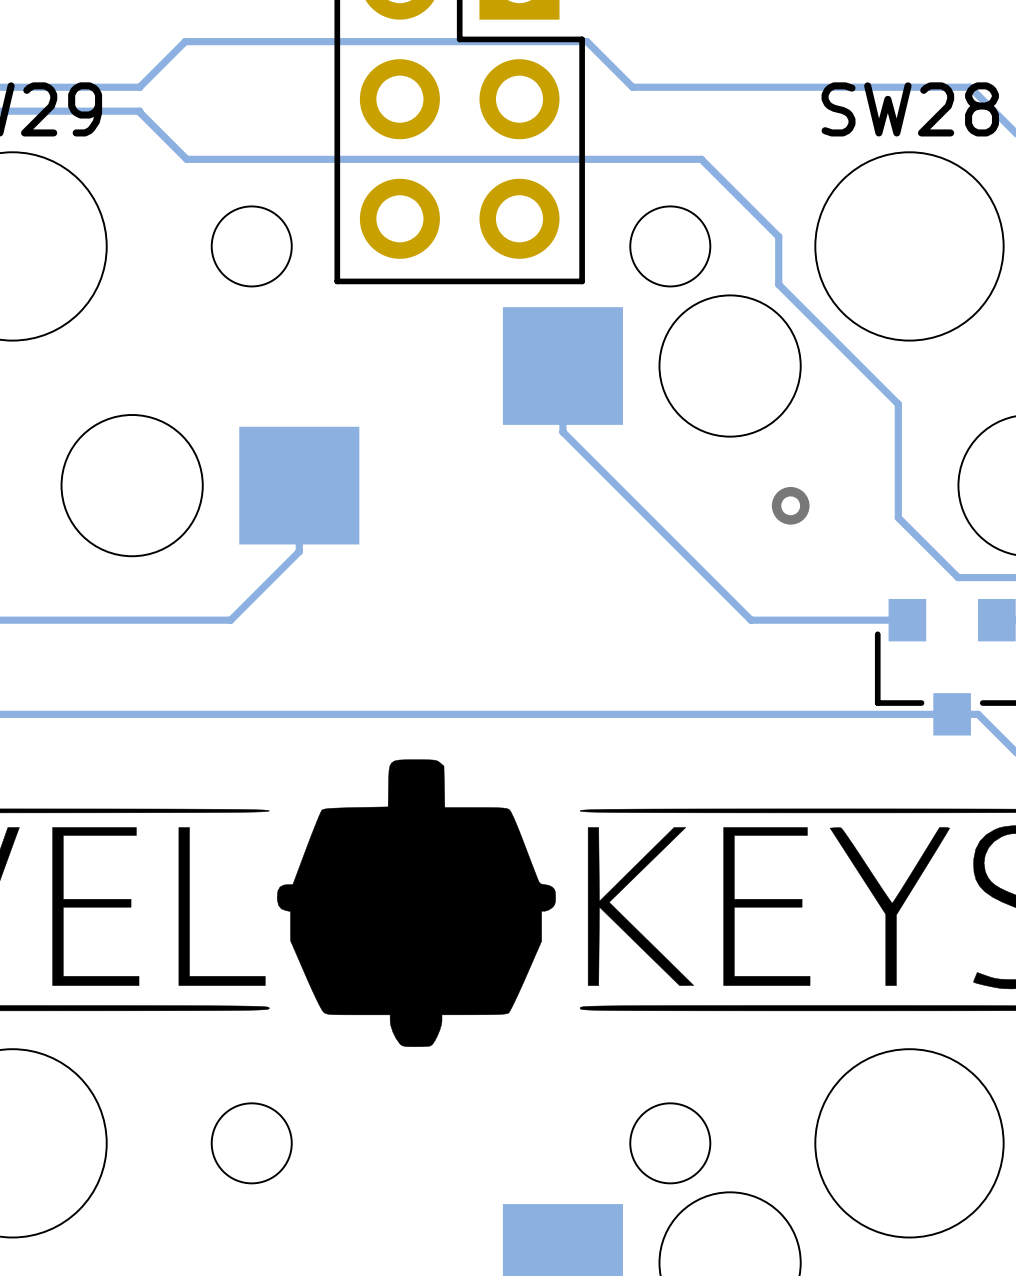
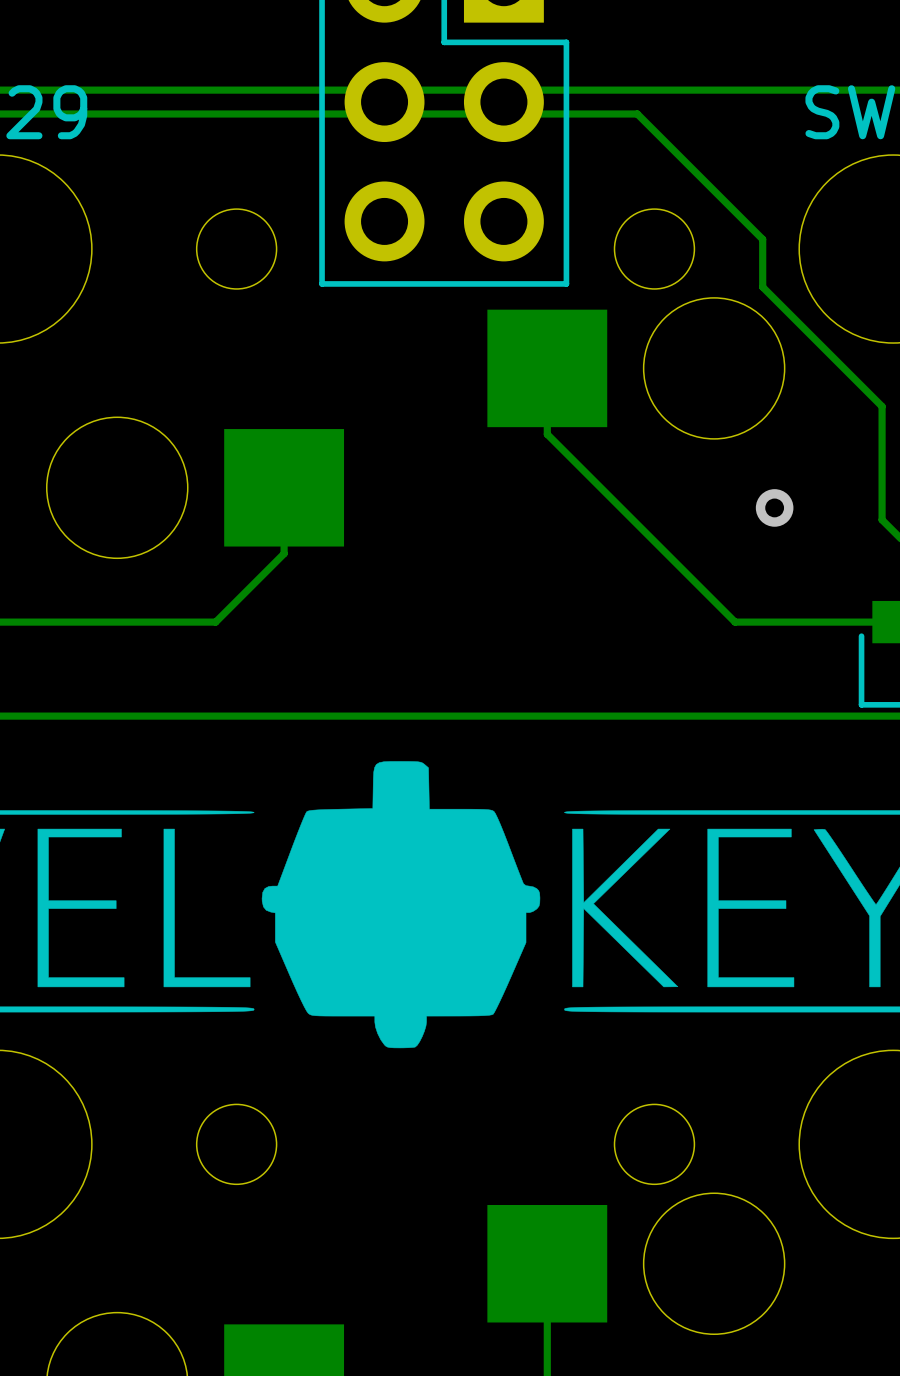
track: (632, 87) (586, 41) (185, 41) (139, 87) -> (616, 90) (124, 90)
track: (139, 111) (186, 159) (701, 159) -> (124, 114) (637, 114) (685, 162)

